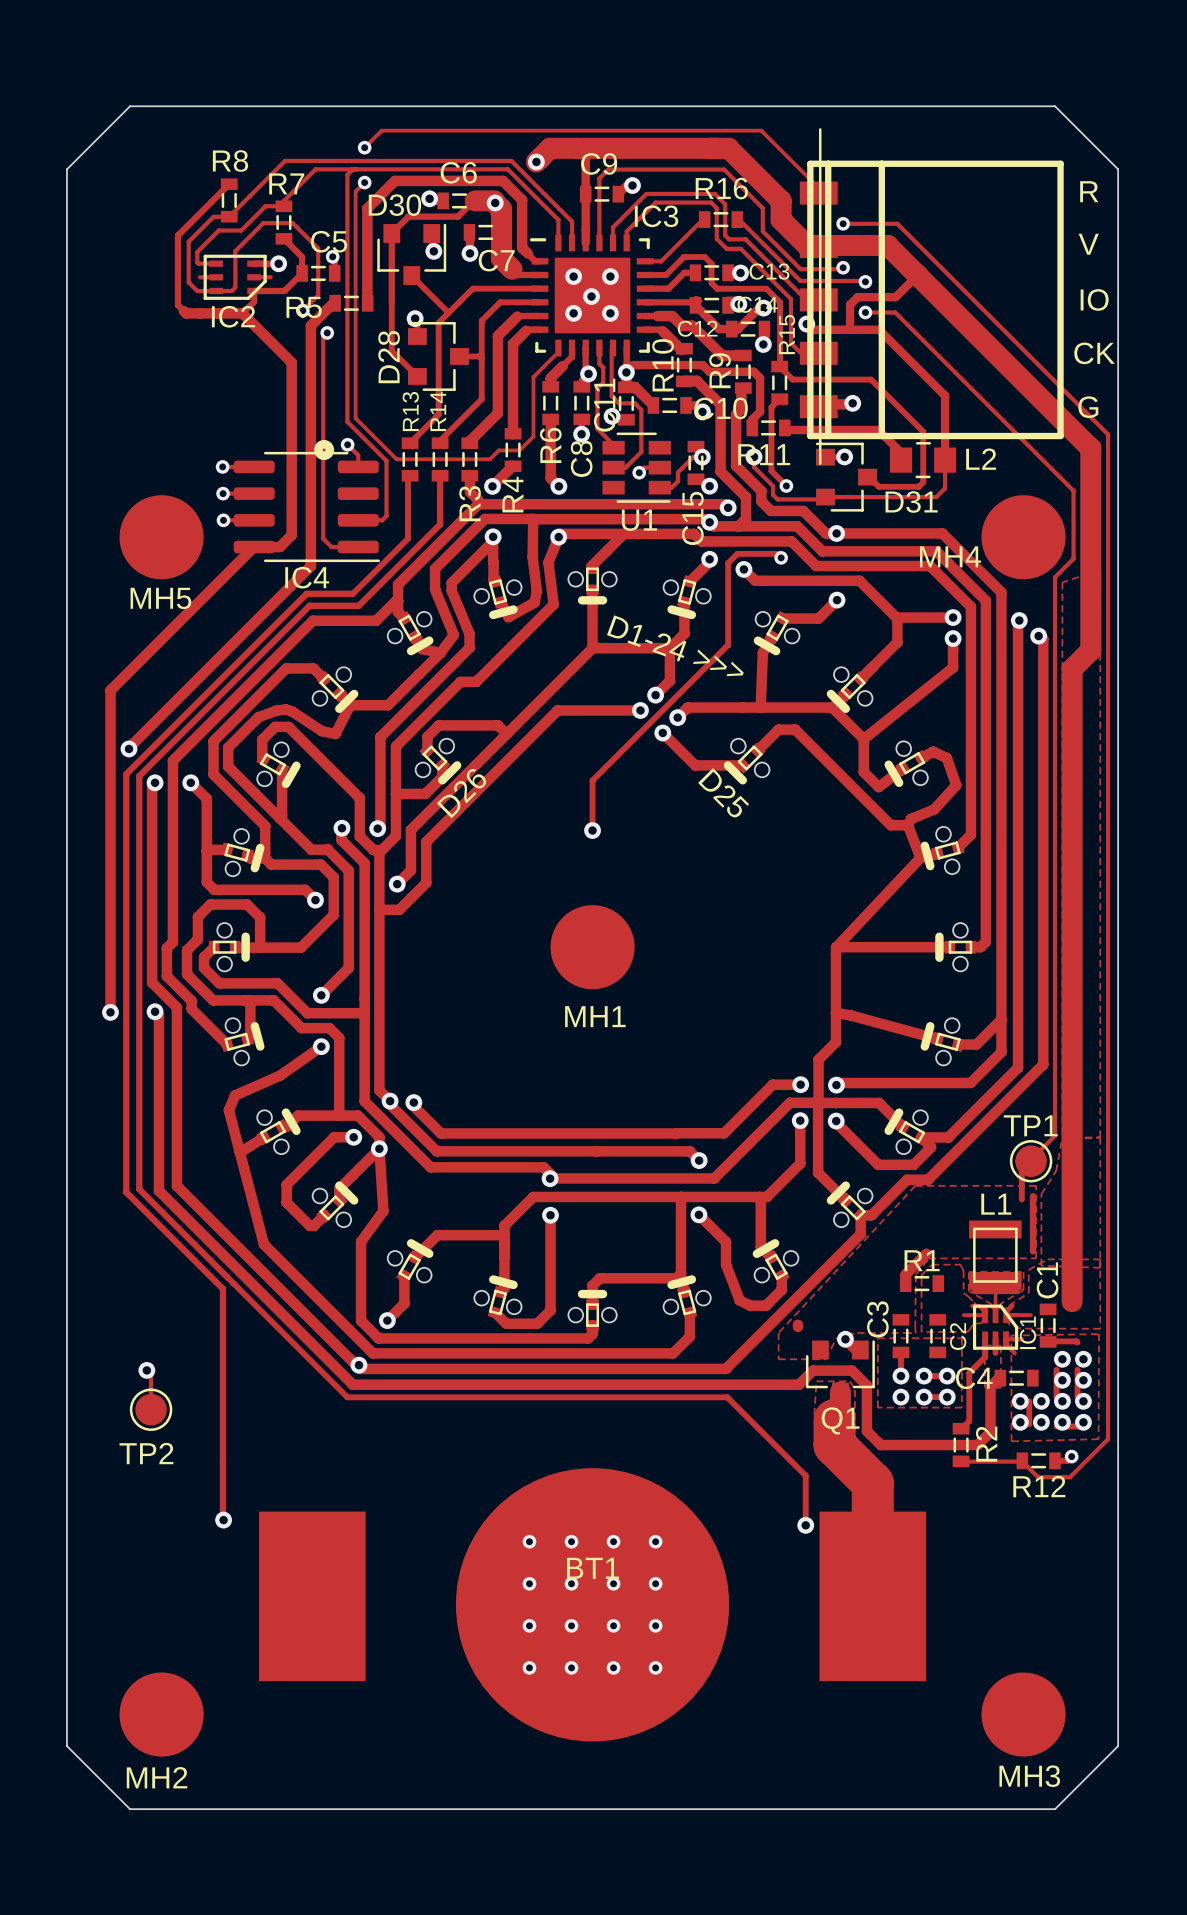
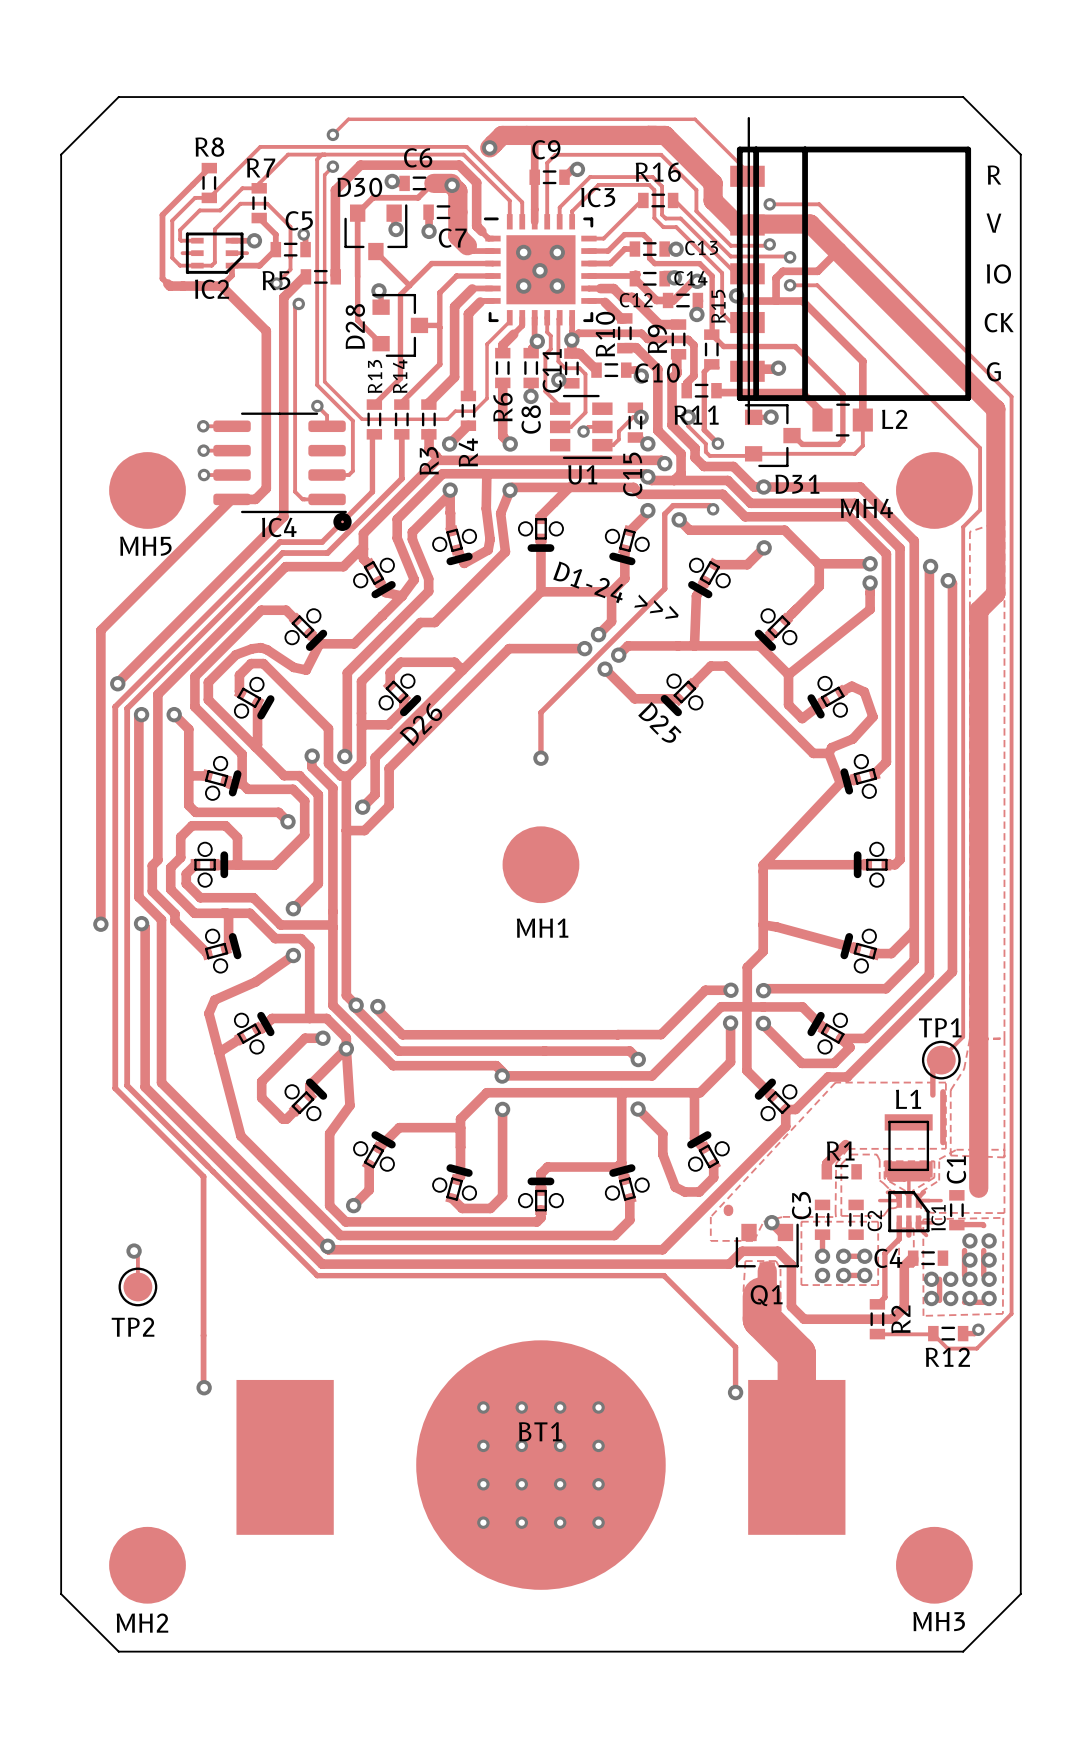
drawing position: (324, 450) -> (342, 521)
D31 name position: D31 (911, 501) -> D31 (797, 484)

